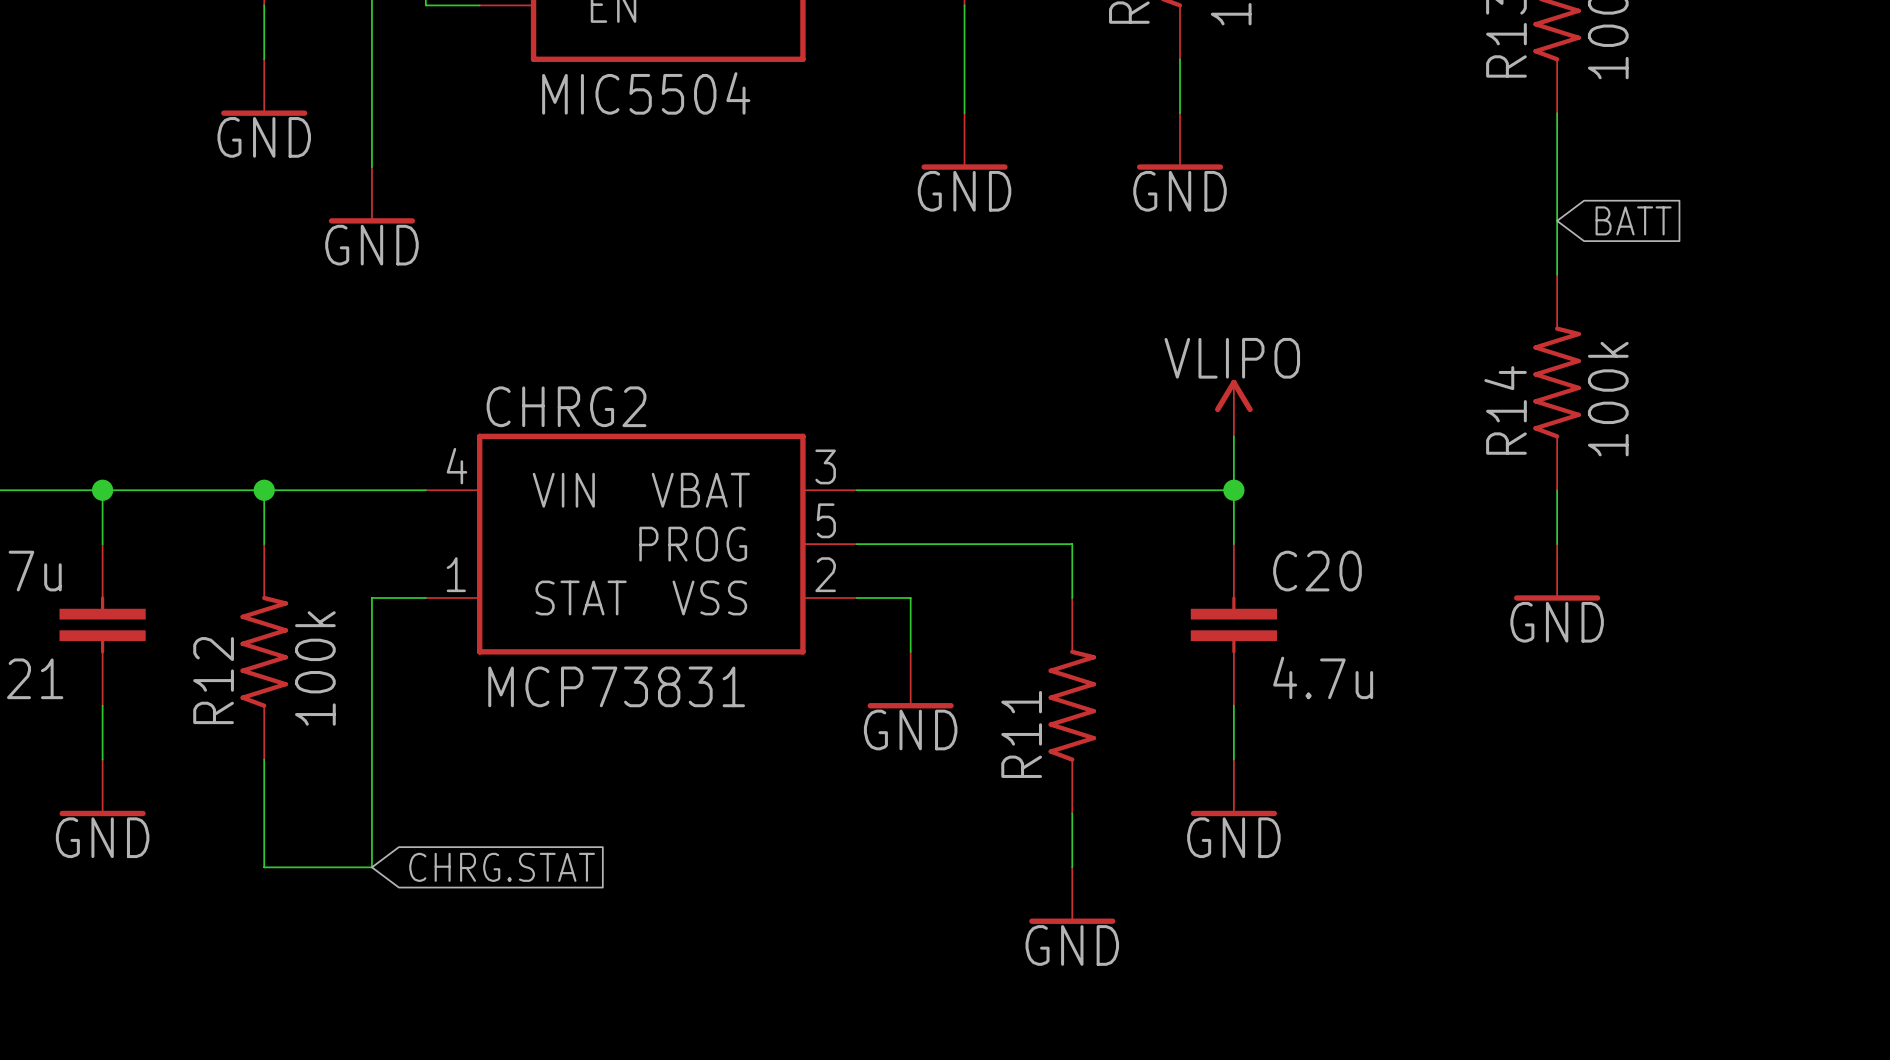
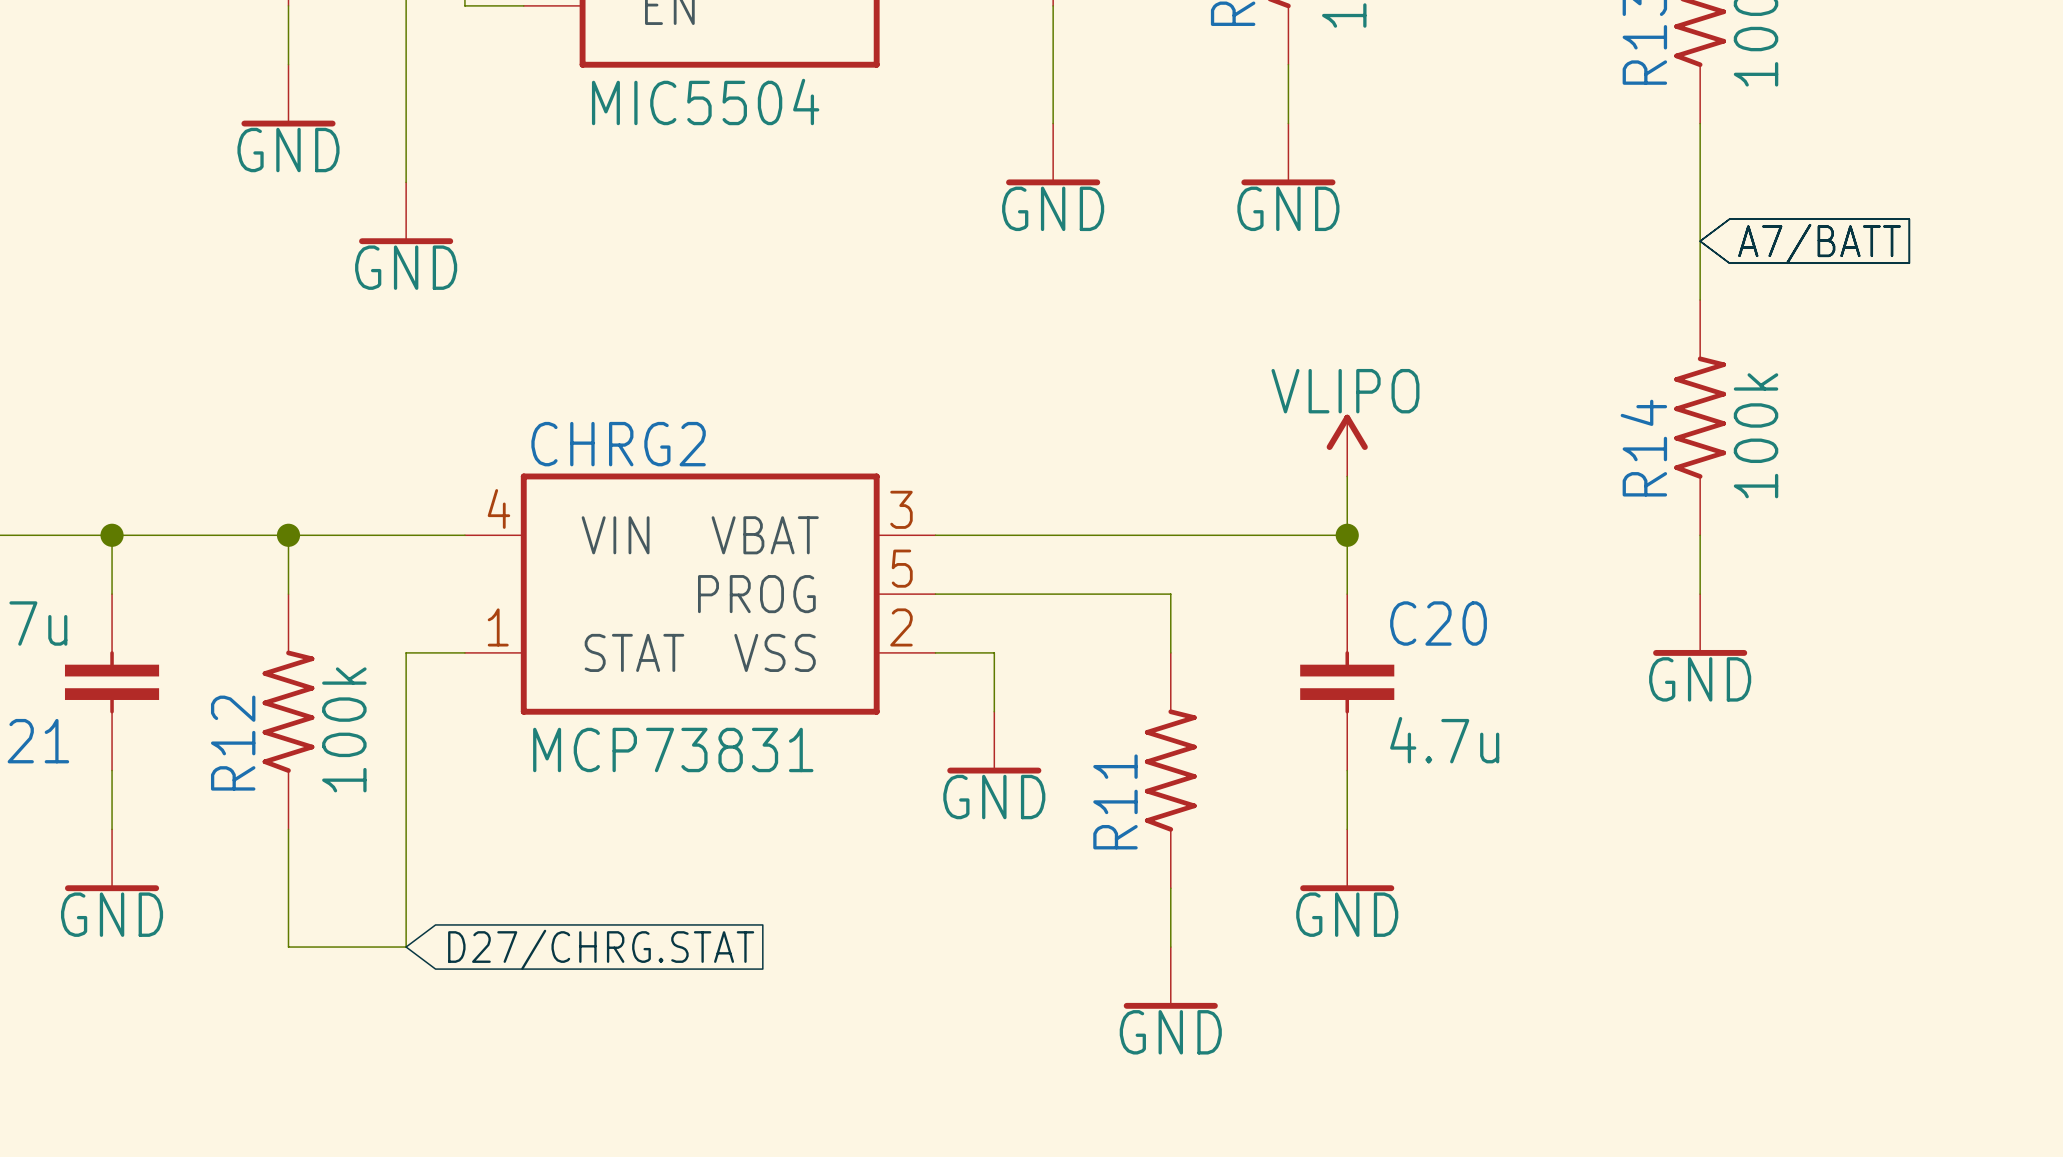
global label: BATT (1633, 220) -> A7/BATT (1819, 243)
global label: CHRG.STAT (502, 867) -> D27/CHRG.STAT (601, 949)

